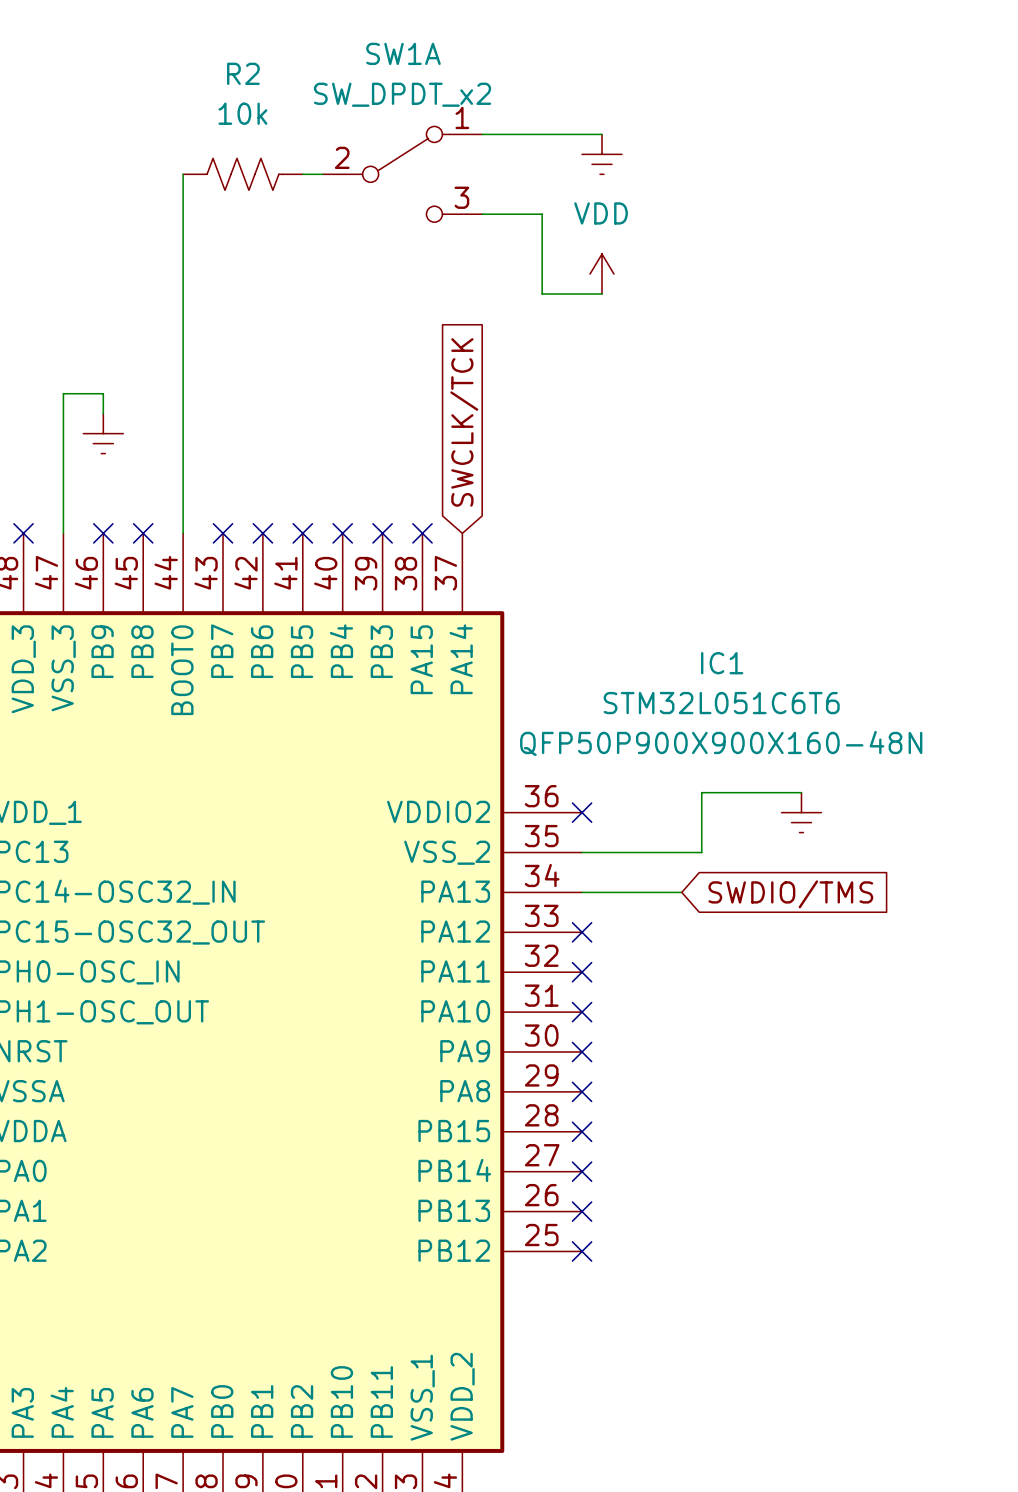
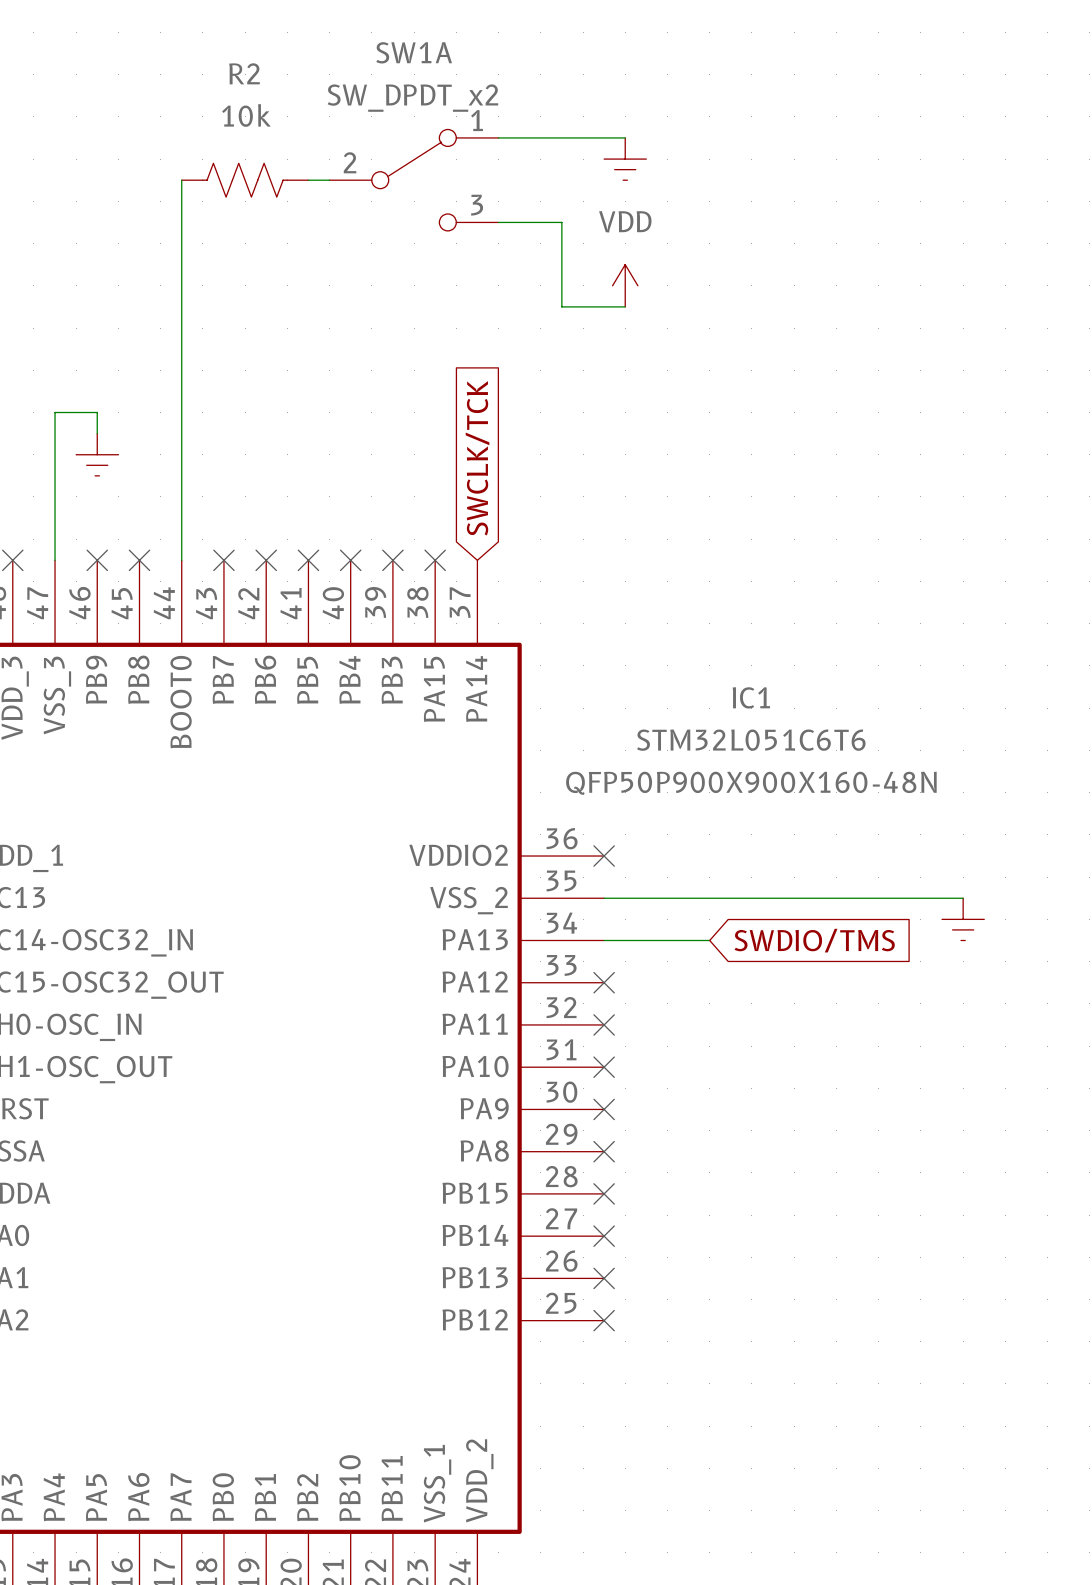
wire: (801, 792) (701, 792) (701, 852) -> (963, 898) (730, 898)
power symbol position: (801, 812) -> (963, 919)

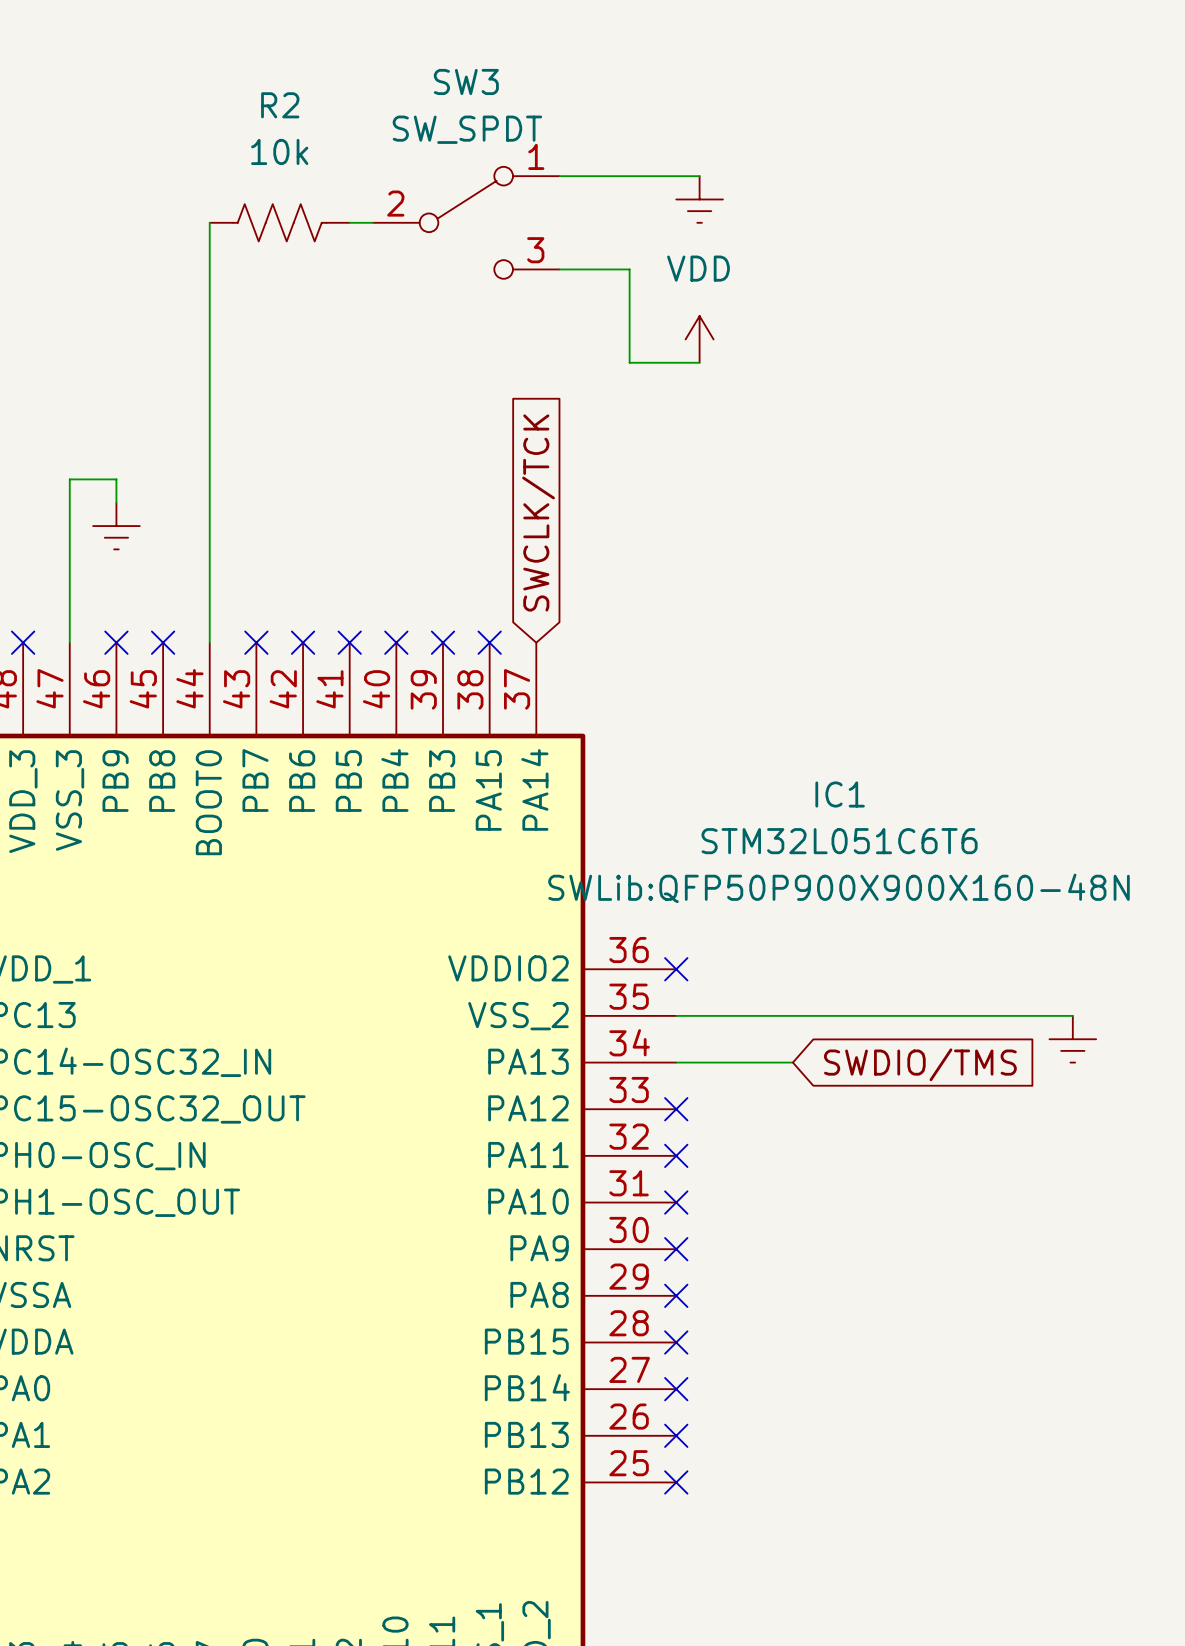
SW1A name: SW1A (414, 52) -> SW3 (466, 81)
SW1A value: SW_DPDT_x2 (412, 98) -> SW_SPDT (467, 129)
IC1 text: QFP50P900X900X160-48N (751, 783) -> SWLib:QFP50P900X900X160-48N (839, 888)

